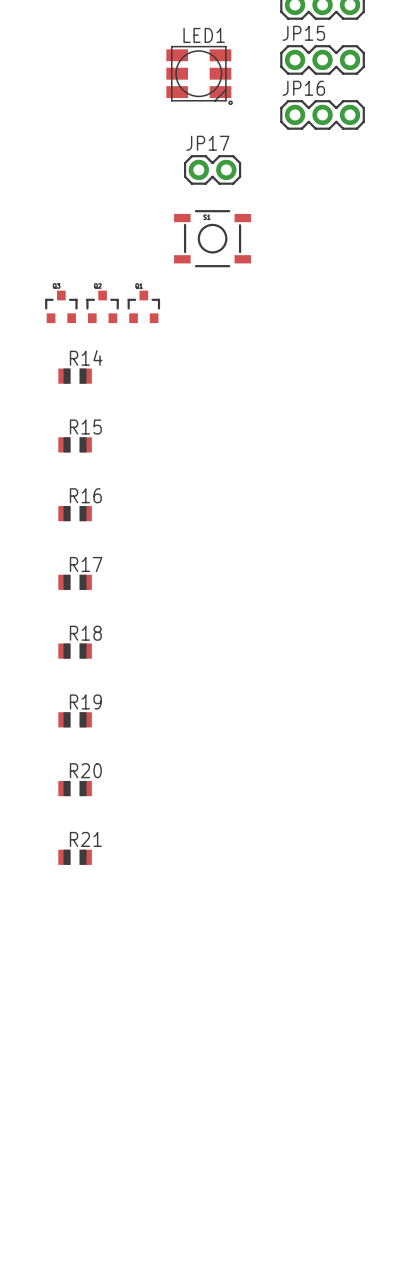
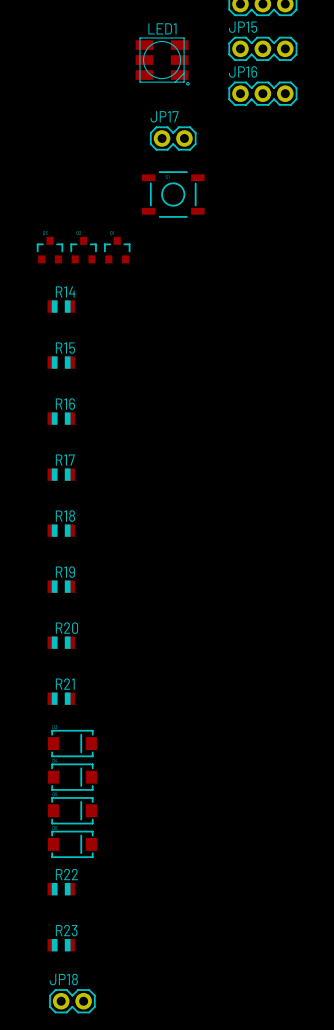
part: none -> (72, 743)
part: none -> (72, 777)
part: none -> (72, 810)
part: none -> (72, 844)
R22: none -> (61, 889)
R23: none -> (61, 945)
JP18: none -> (72, 1001)

